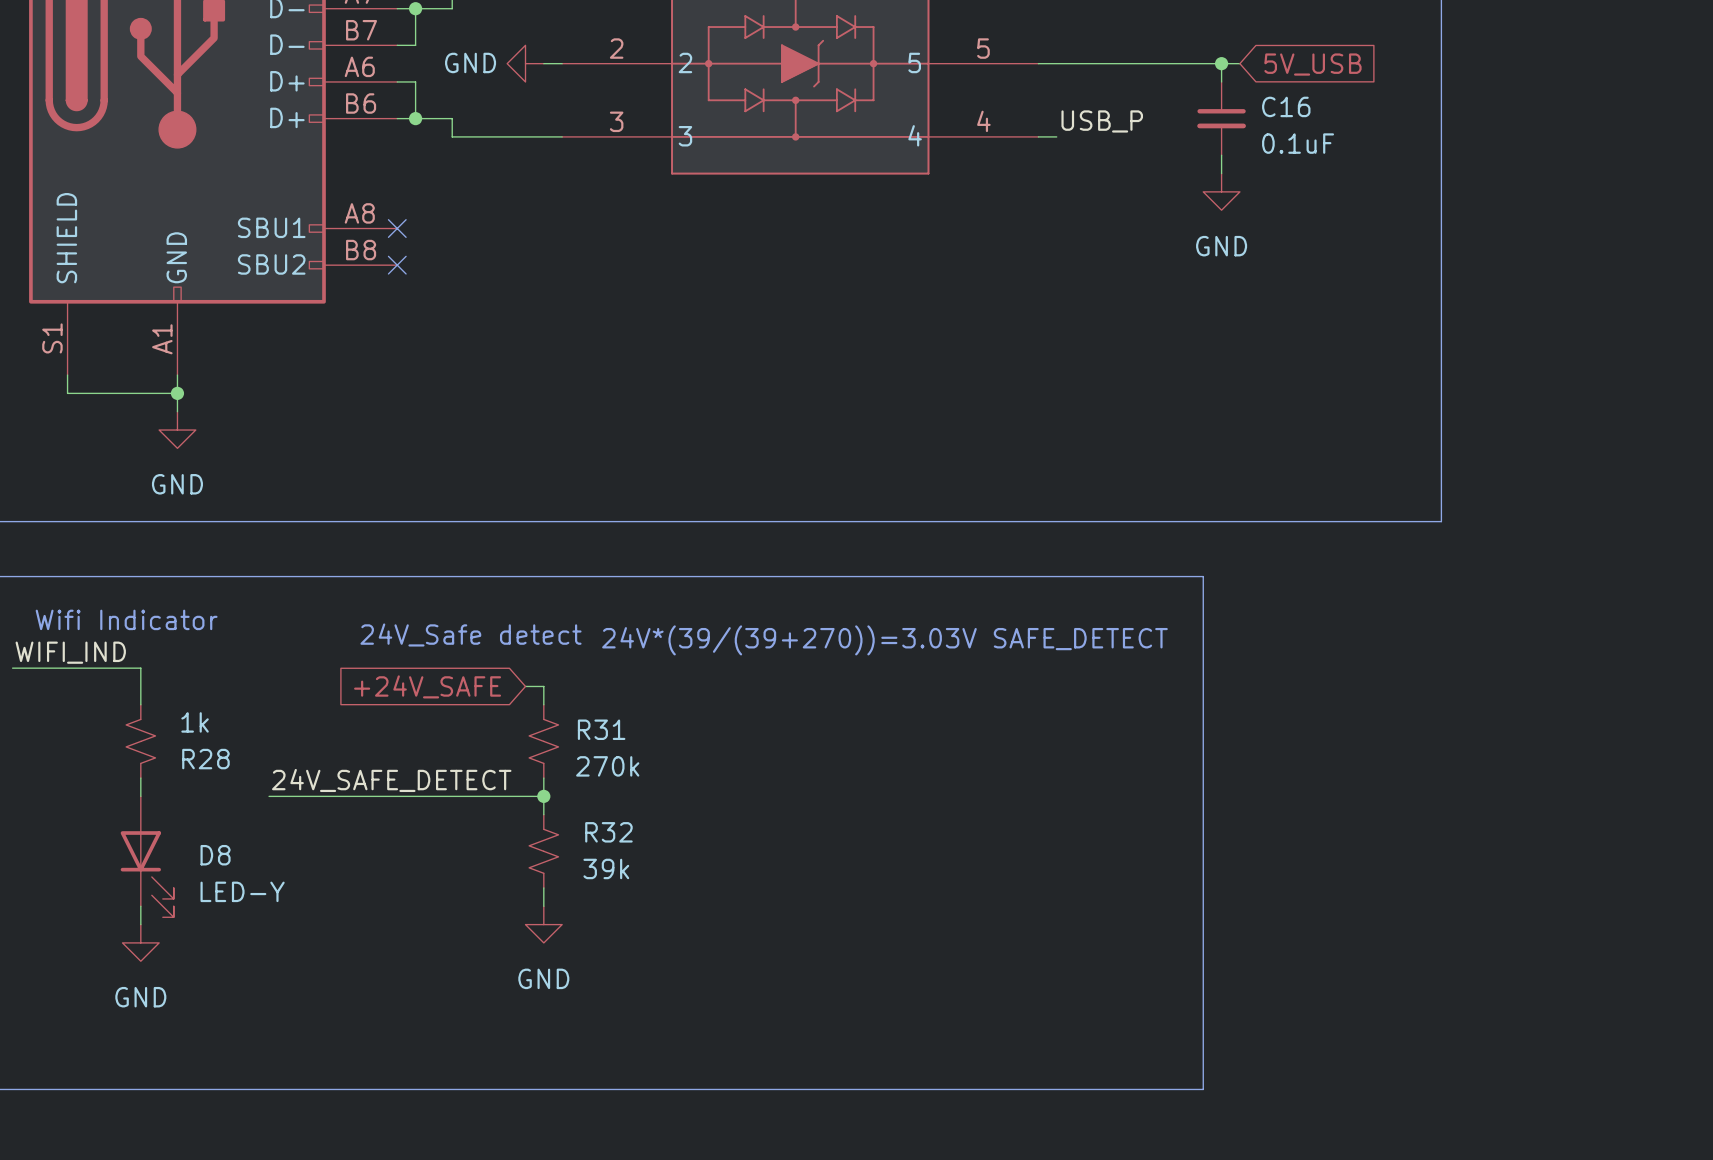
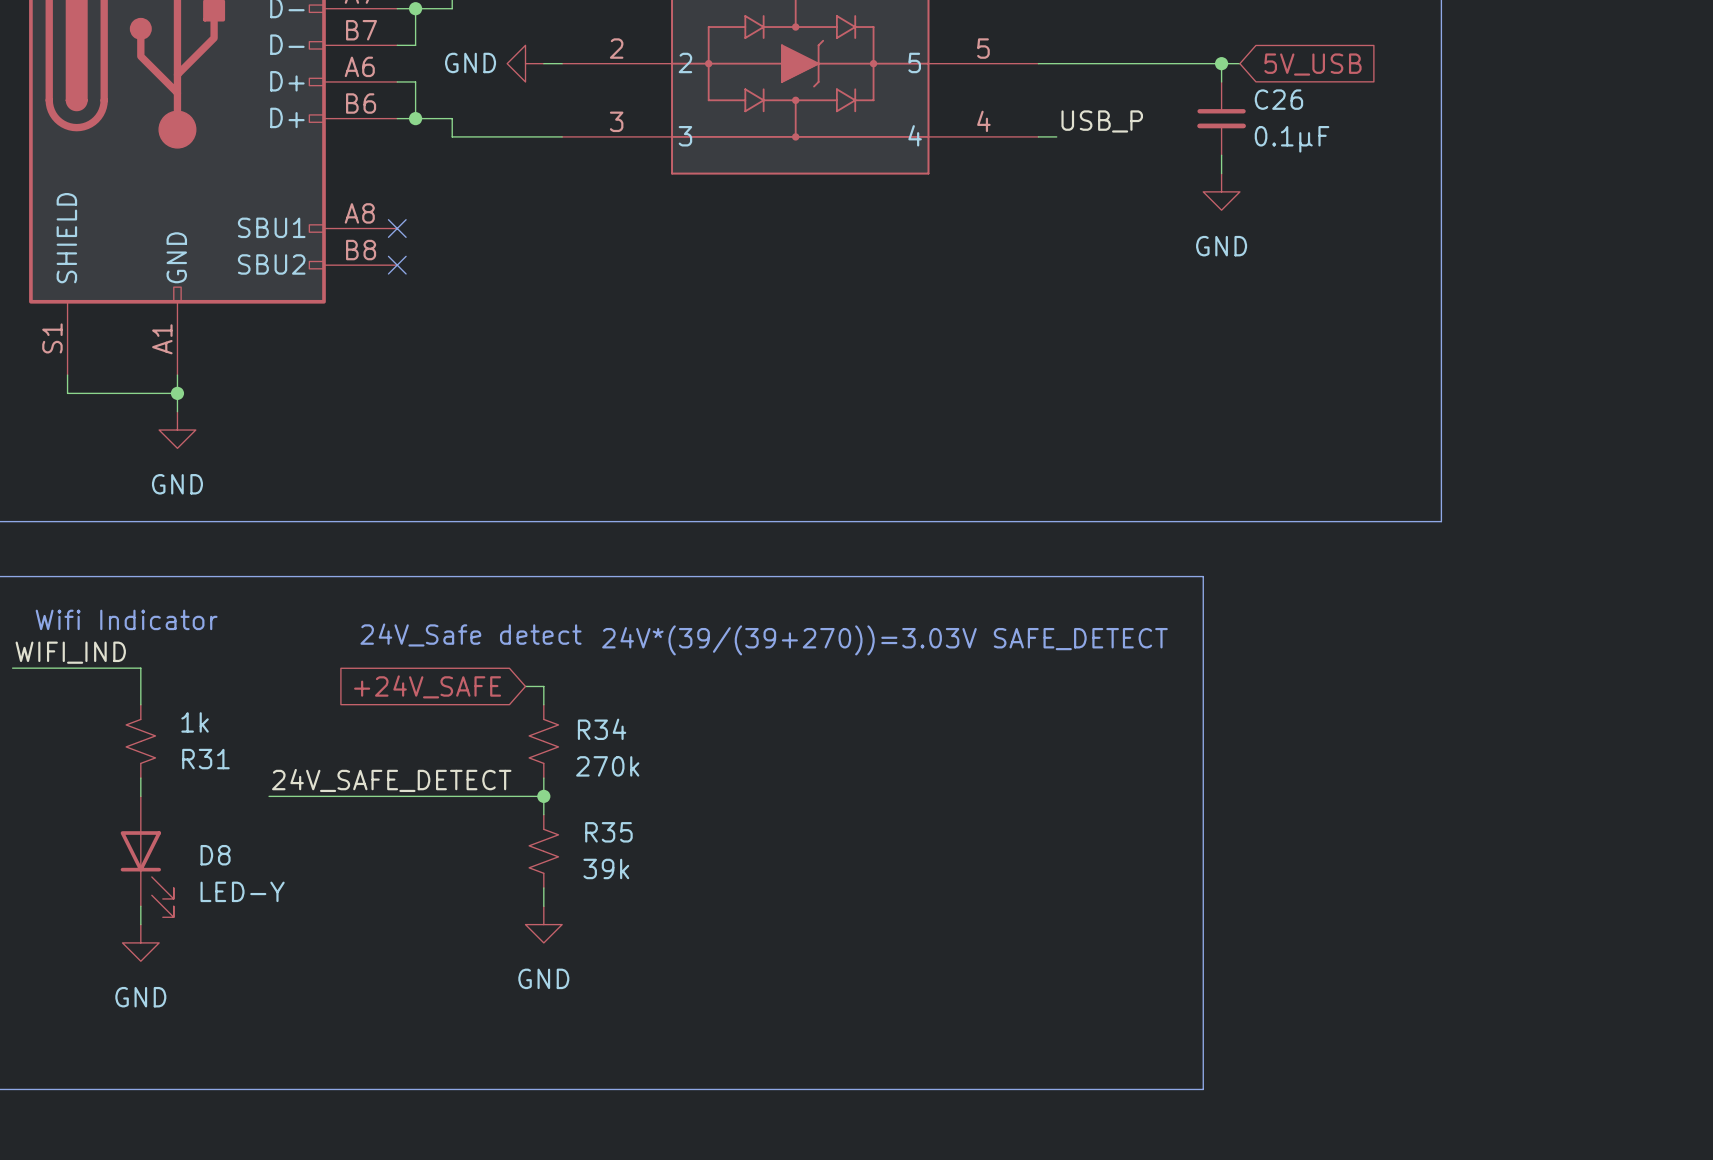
C16 name: C16 (1286, 106) -> C26 (1278, 99)
C16 value: 0.1uF (1298, 143) -> 0.1μF (1292, 139)
R31 name: R31 (601, 729) -> R34 (602, 729)
R28 name: R28 (205, 759) -> R31 (205, 759)
R32 name: R32 (608, 832) -> R35 (608, 832)

